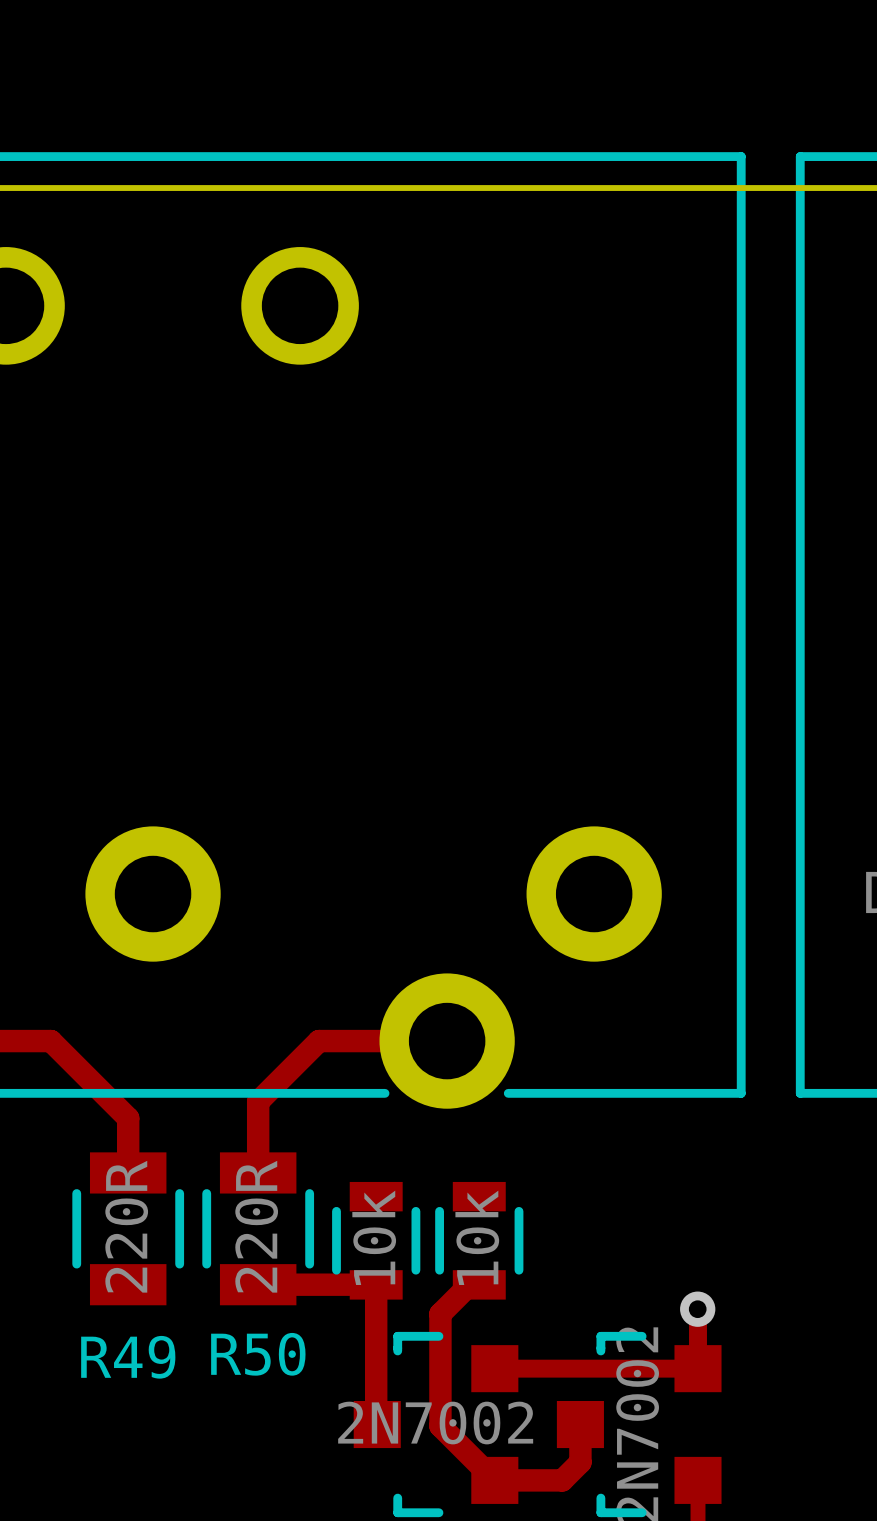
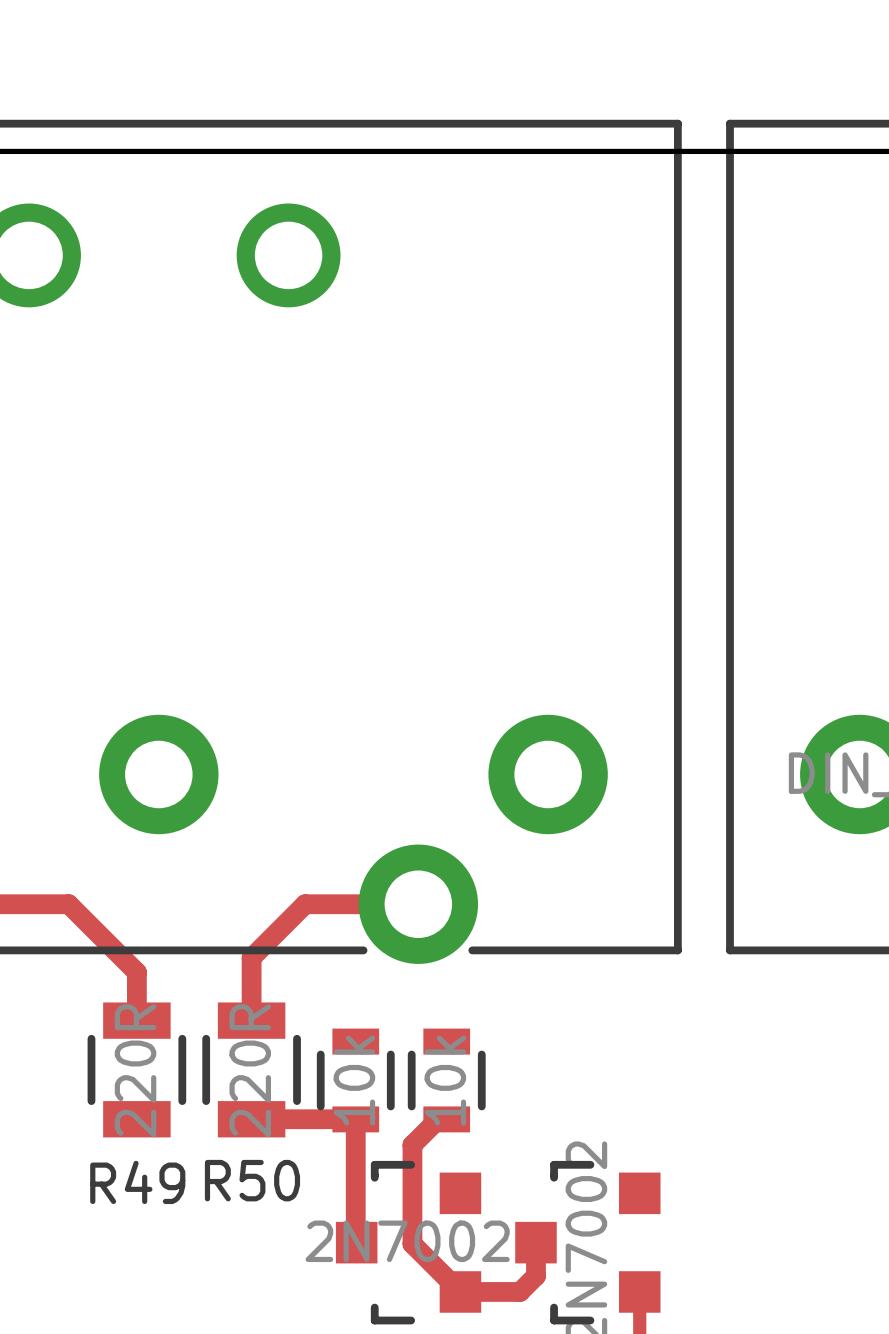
via: (697, 1309) -> none
track: (698, 1309) (698, 1368) (494, 1368) -> none

